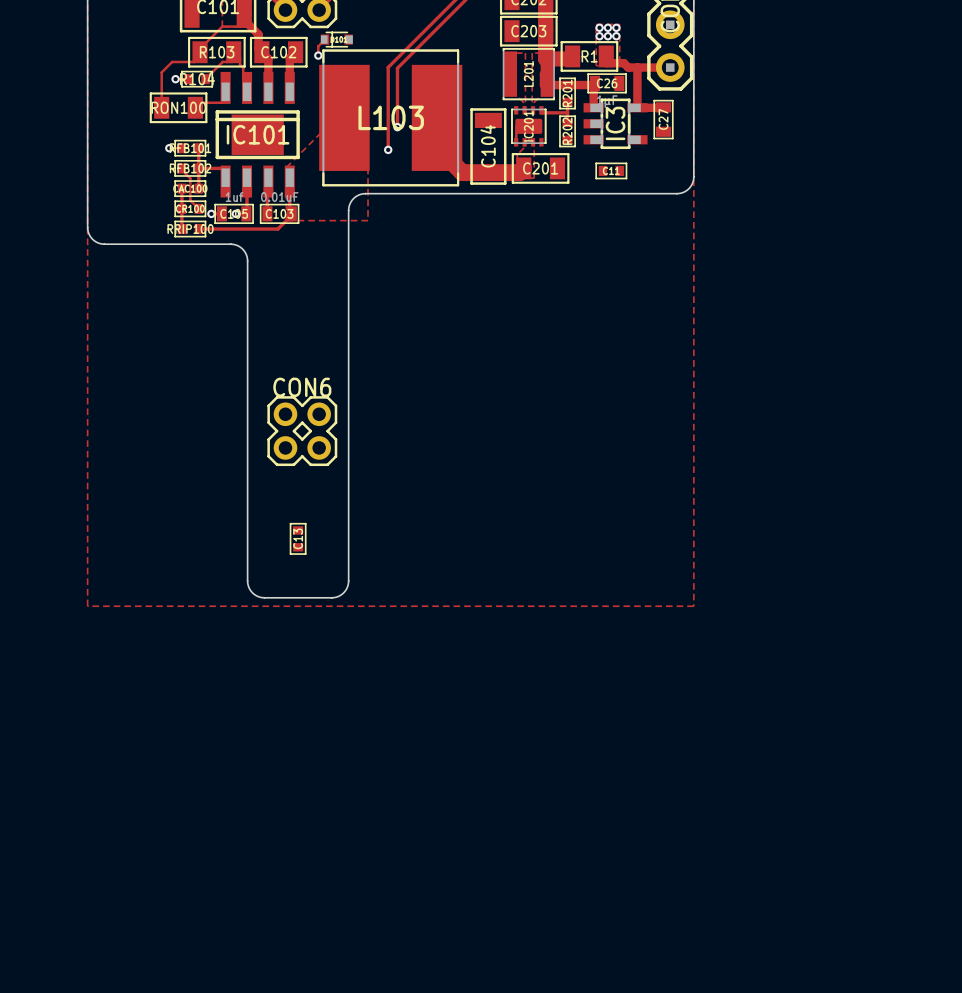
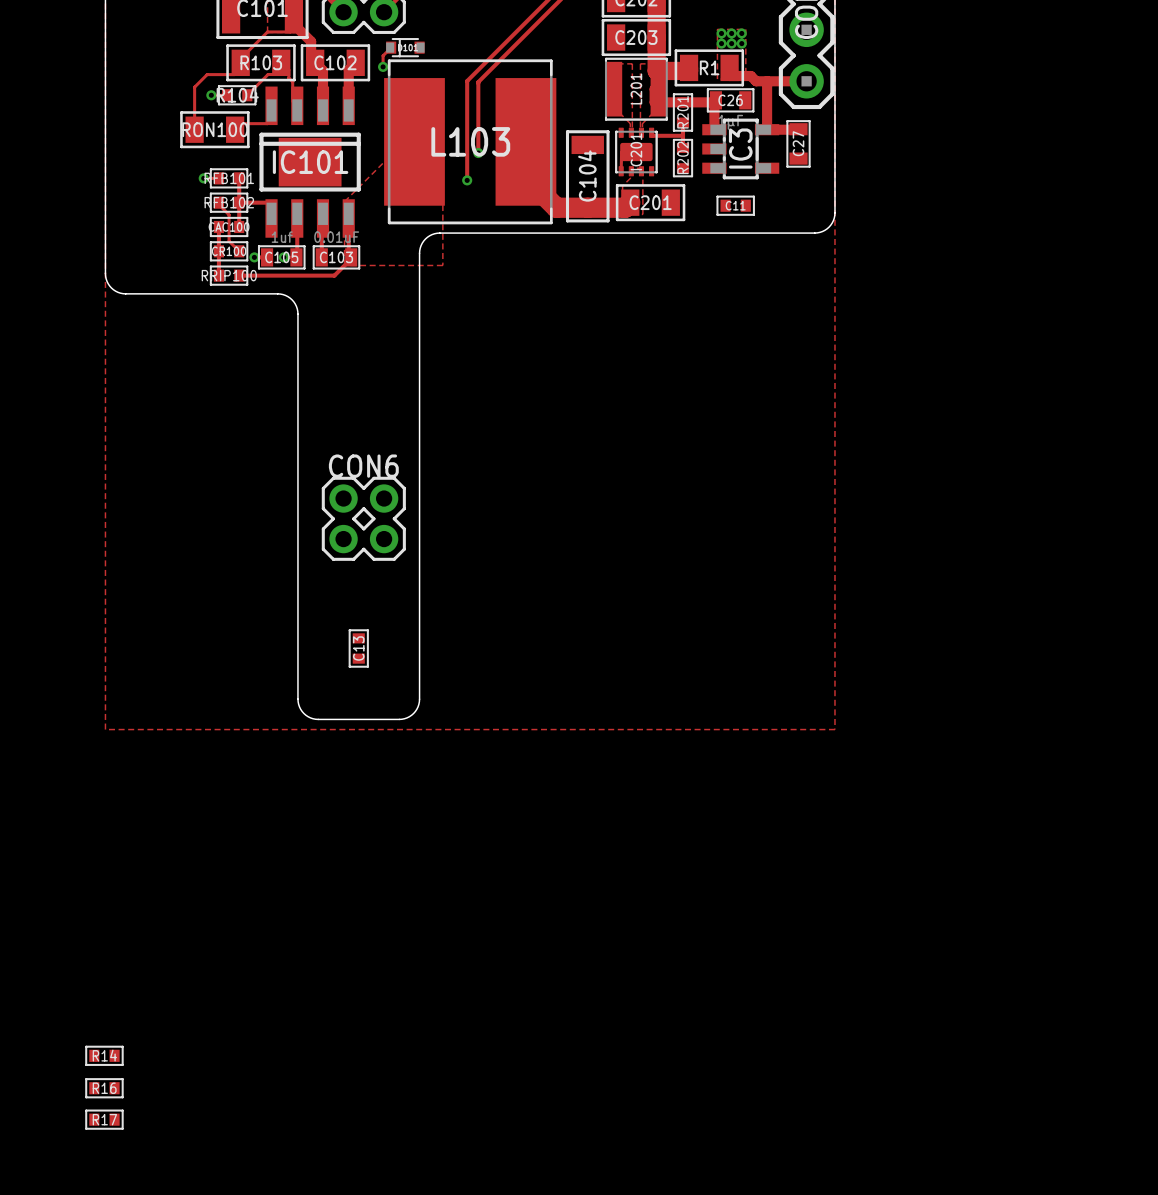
R14: none -> (104, 1055)
R16: none -> (104, 1088)
R17: none -> (104, 1119)

